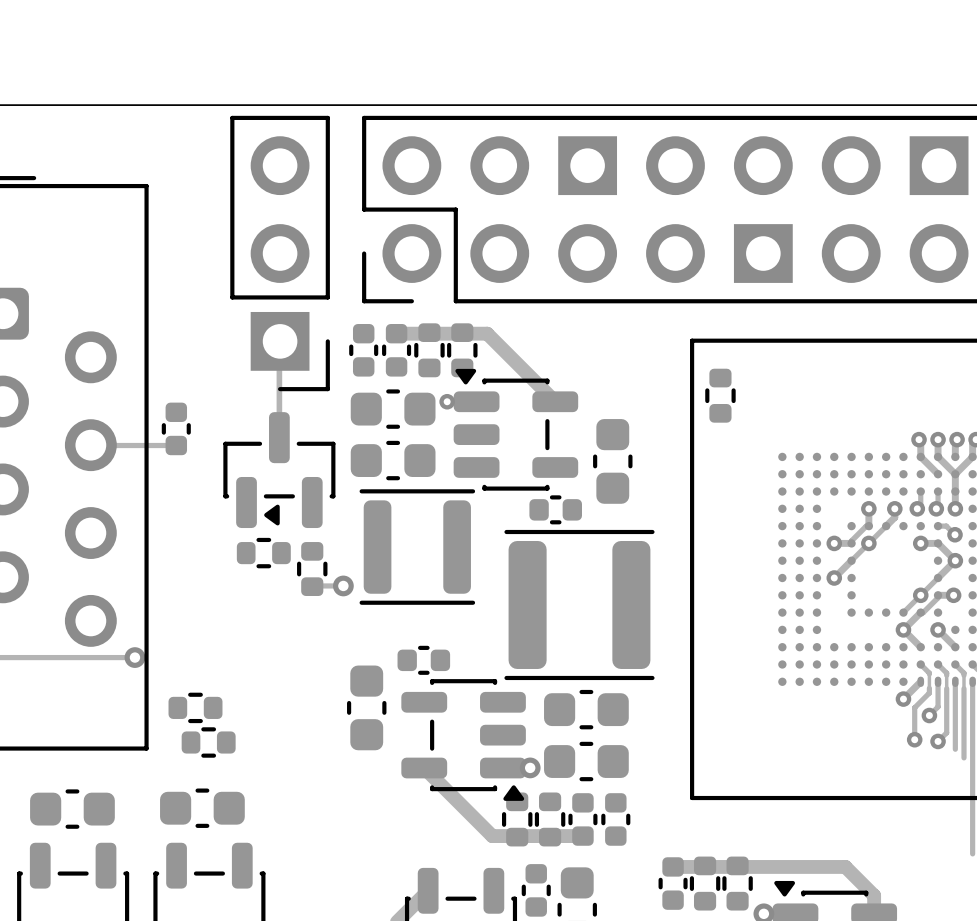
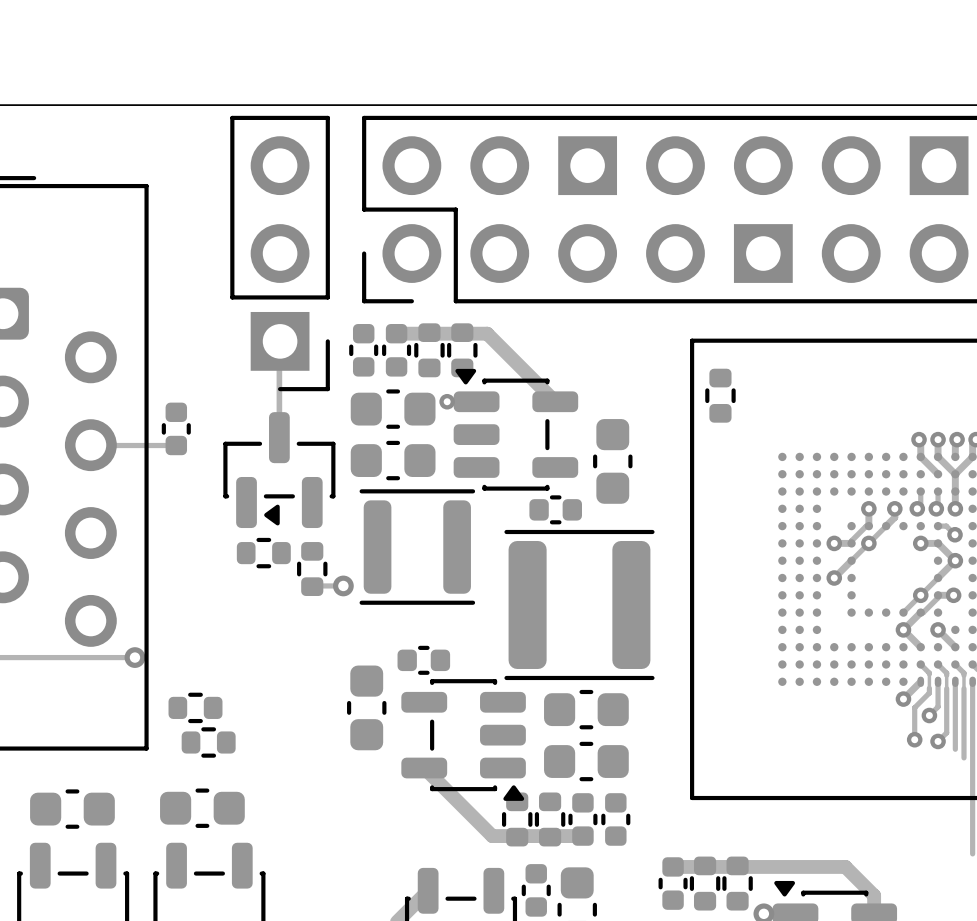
via: (530, 767) -> none

